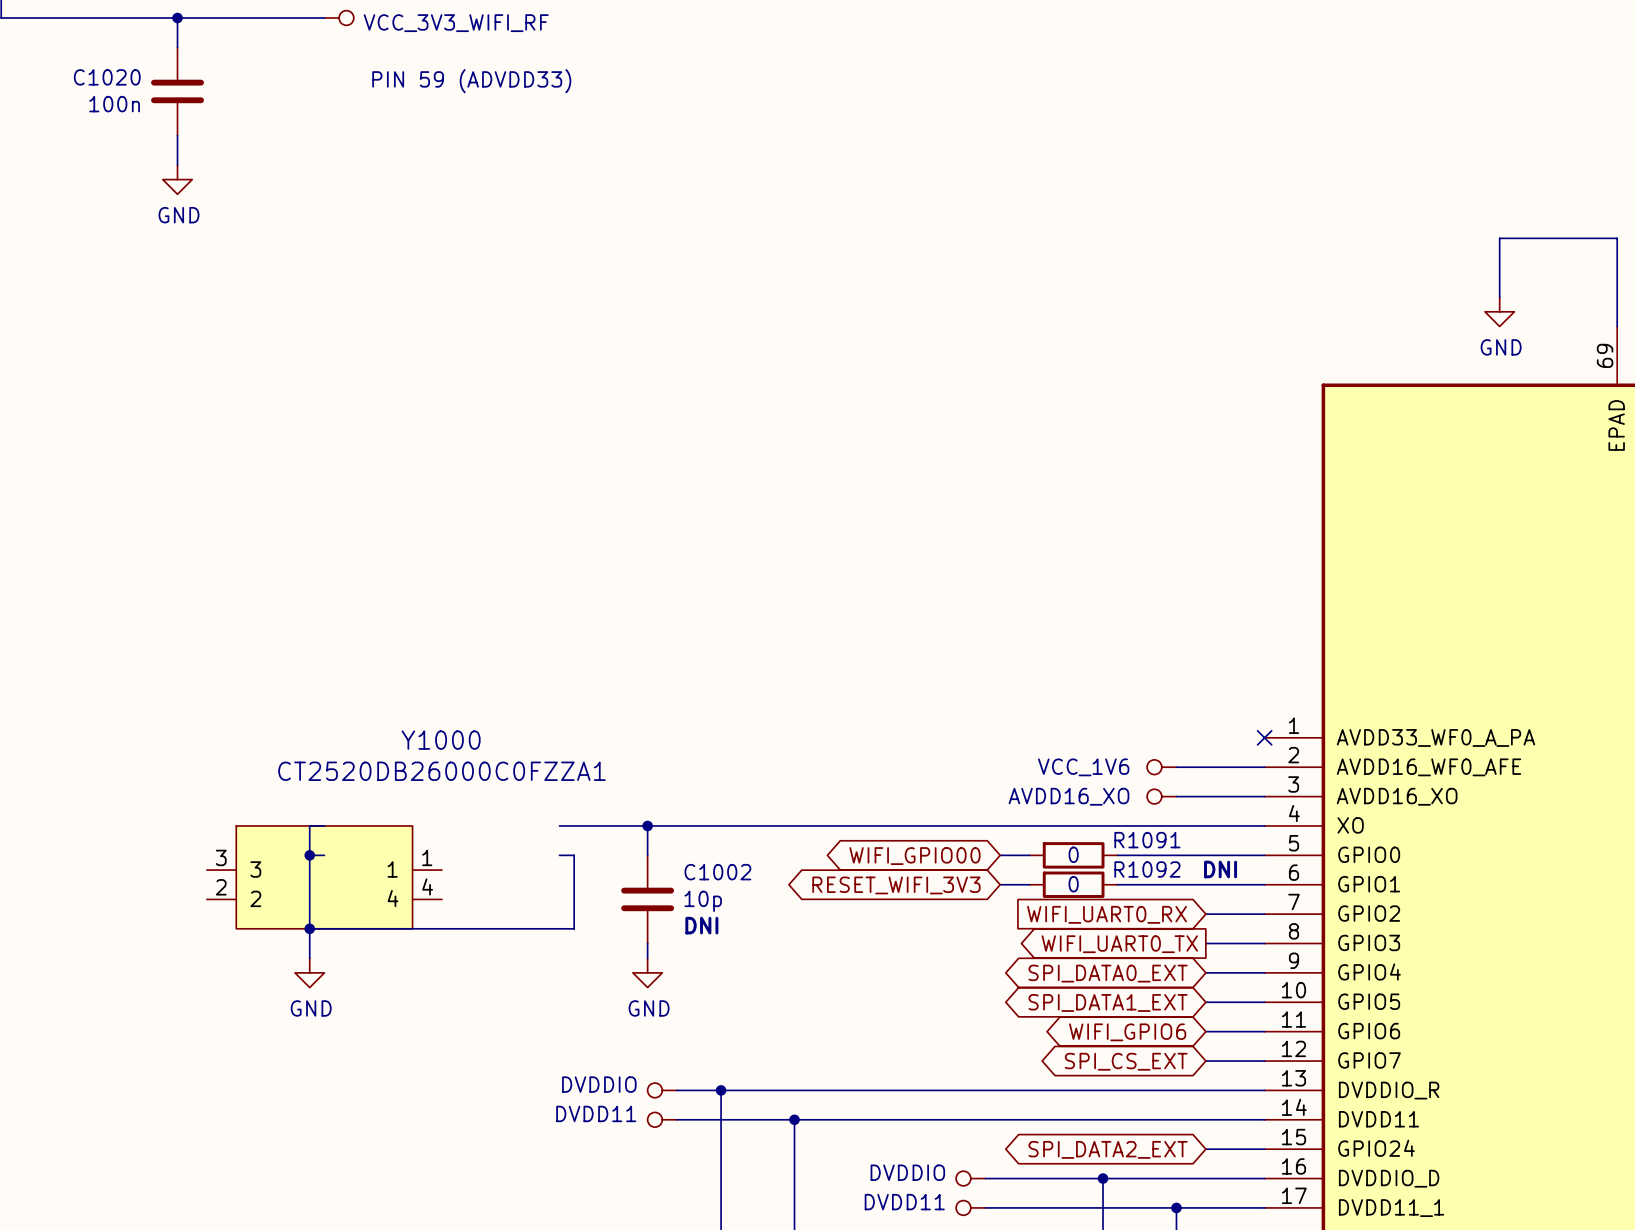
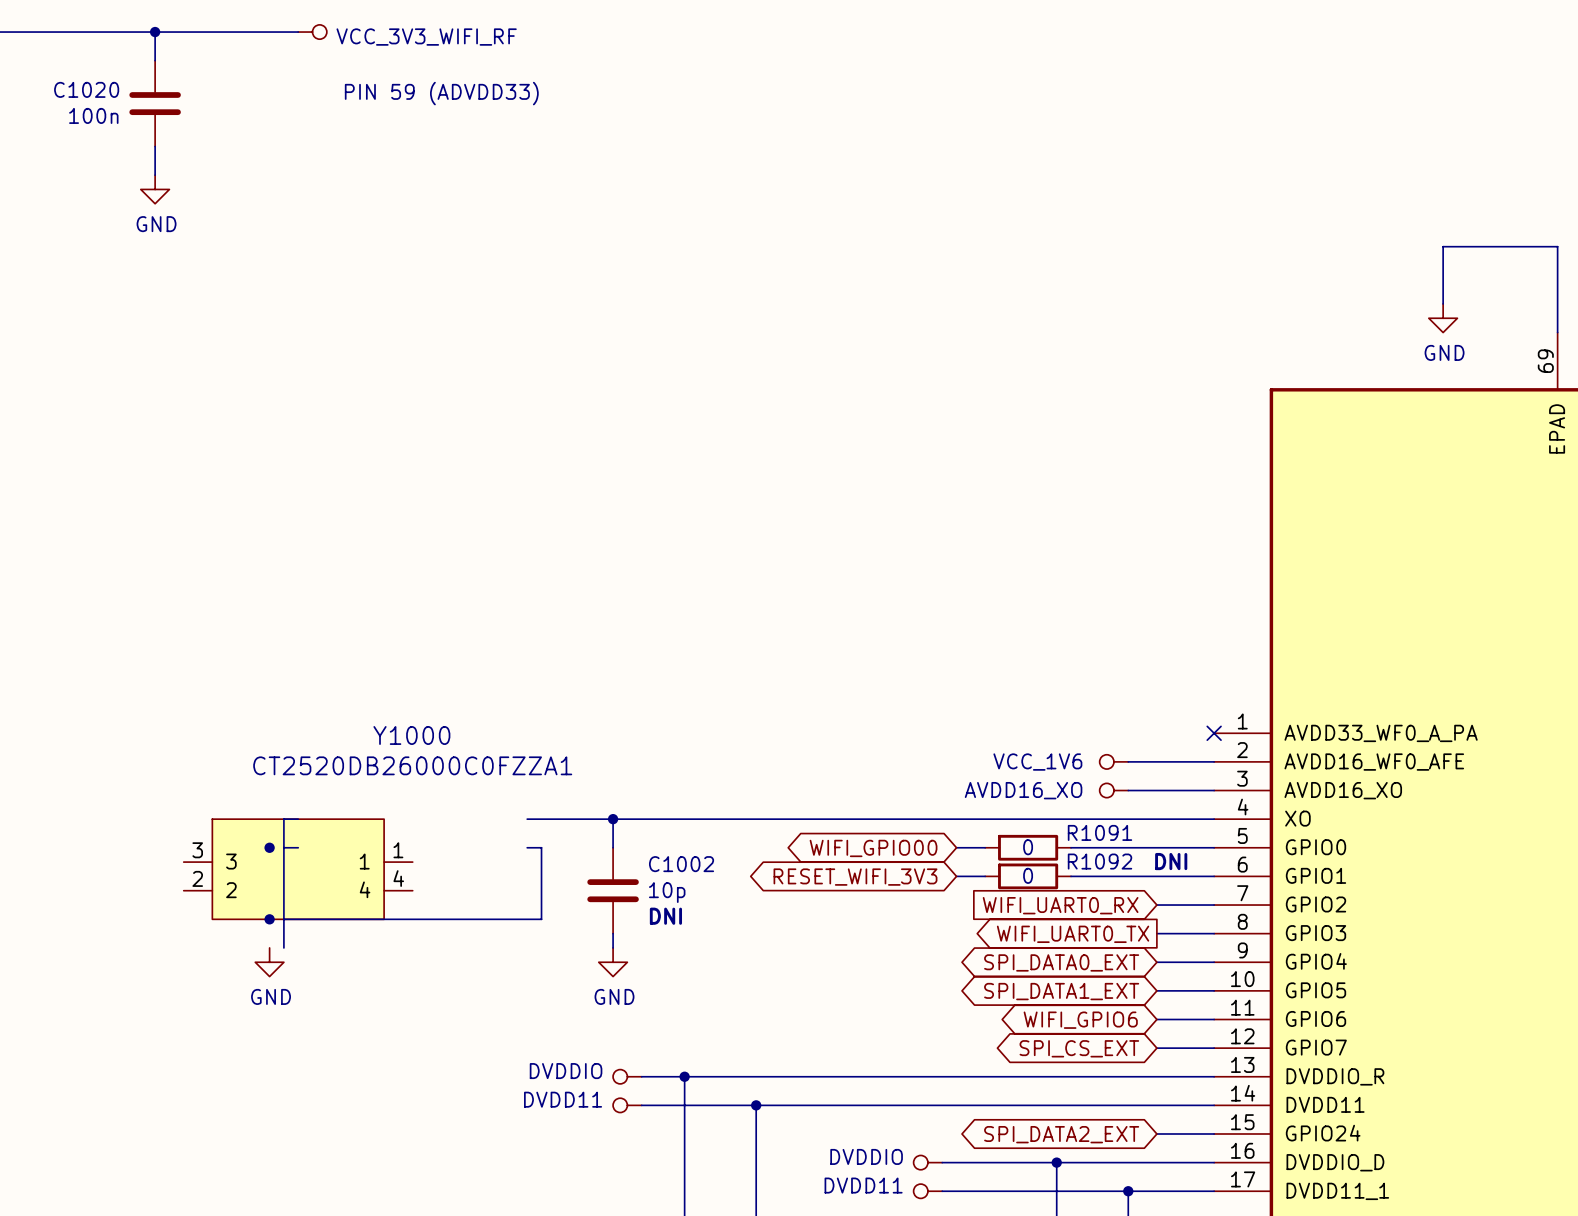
junction position: (309, 855) -> (269, 847)
junction position: (309, 928) -> (269, 919)
power symbol position: GND (309, 972) -> GND (269, 962)

